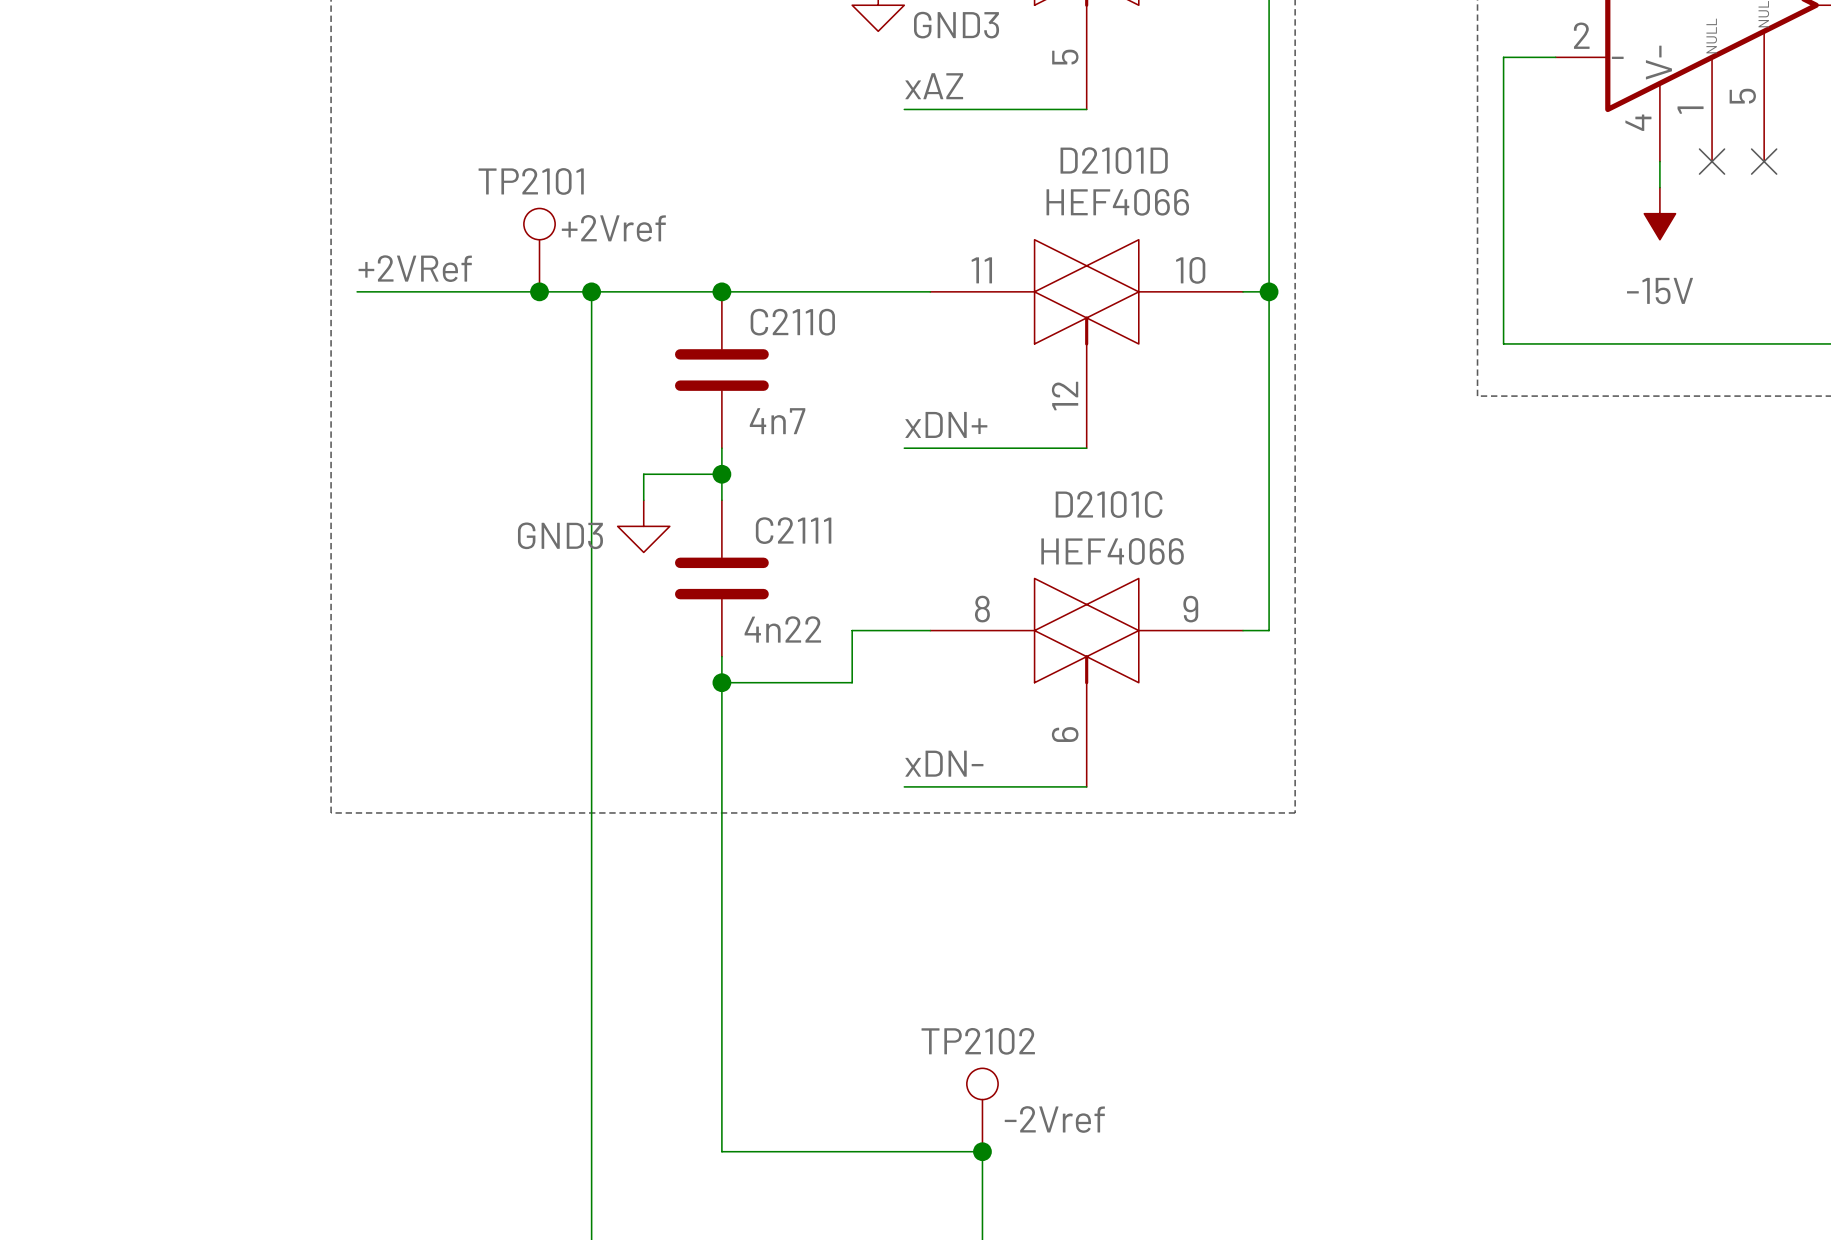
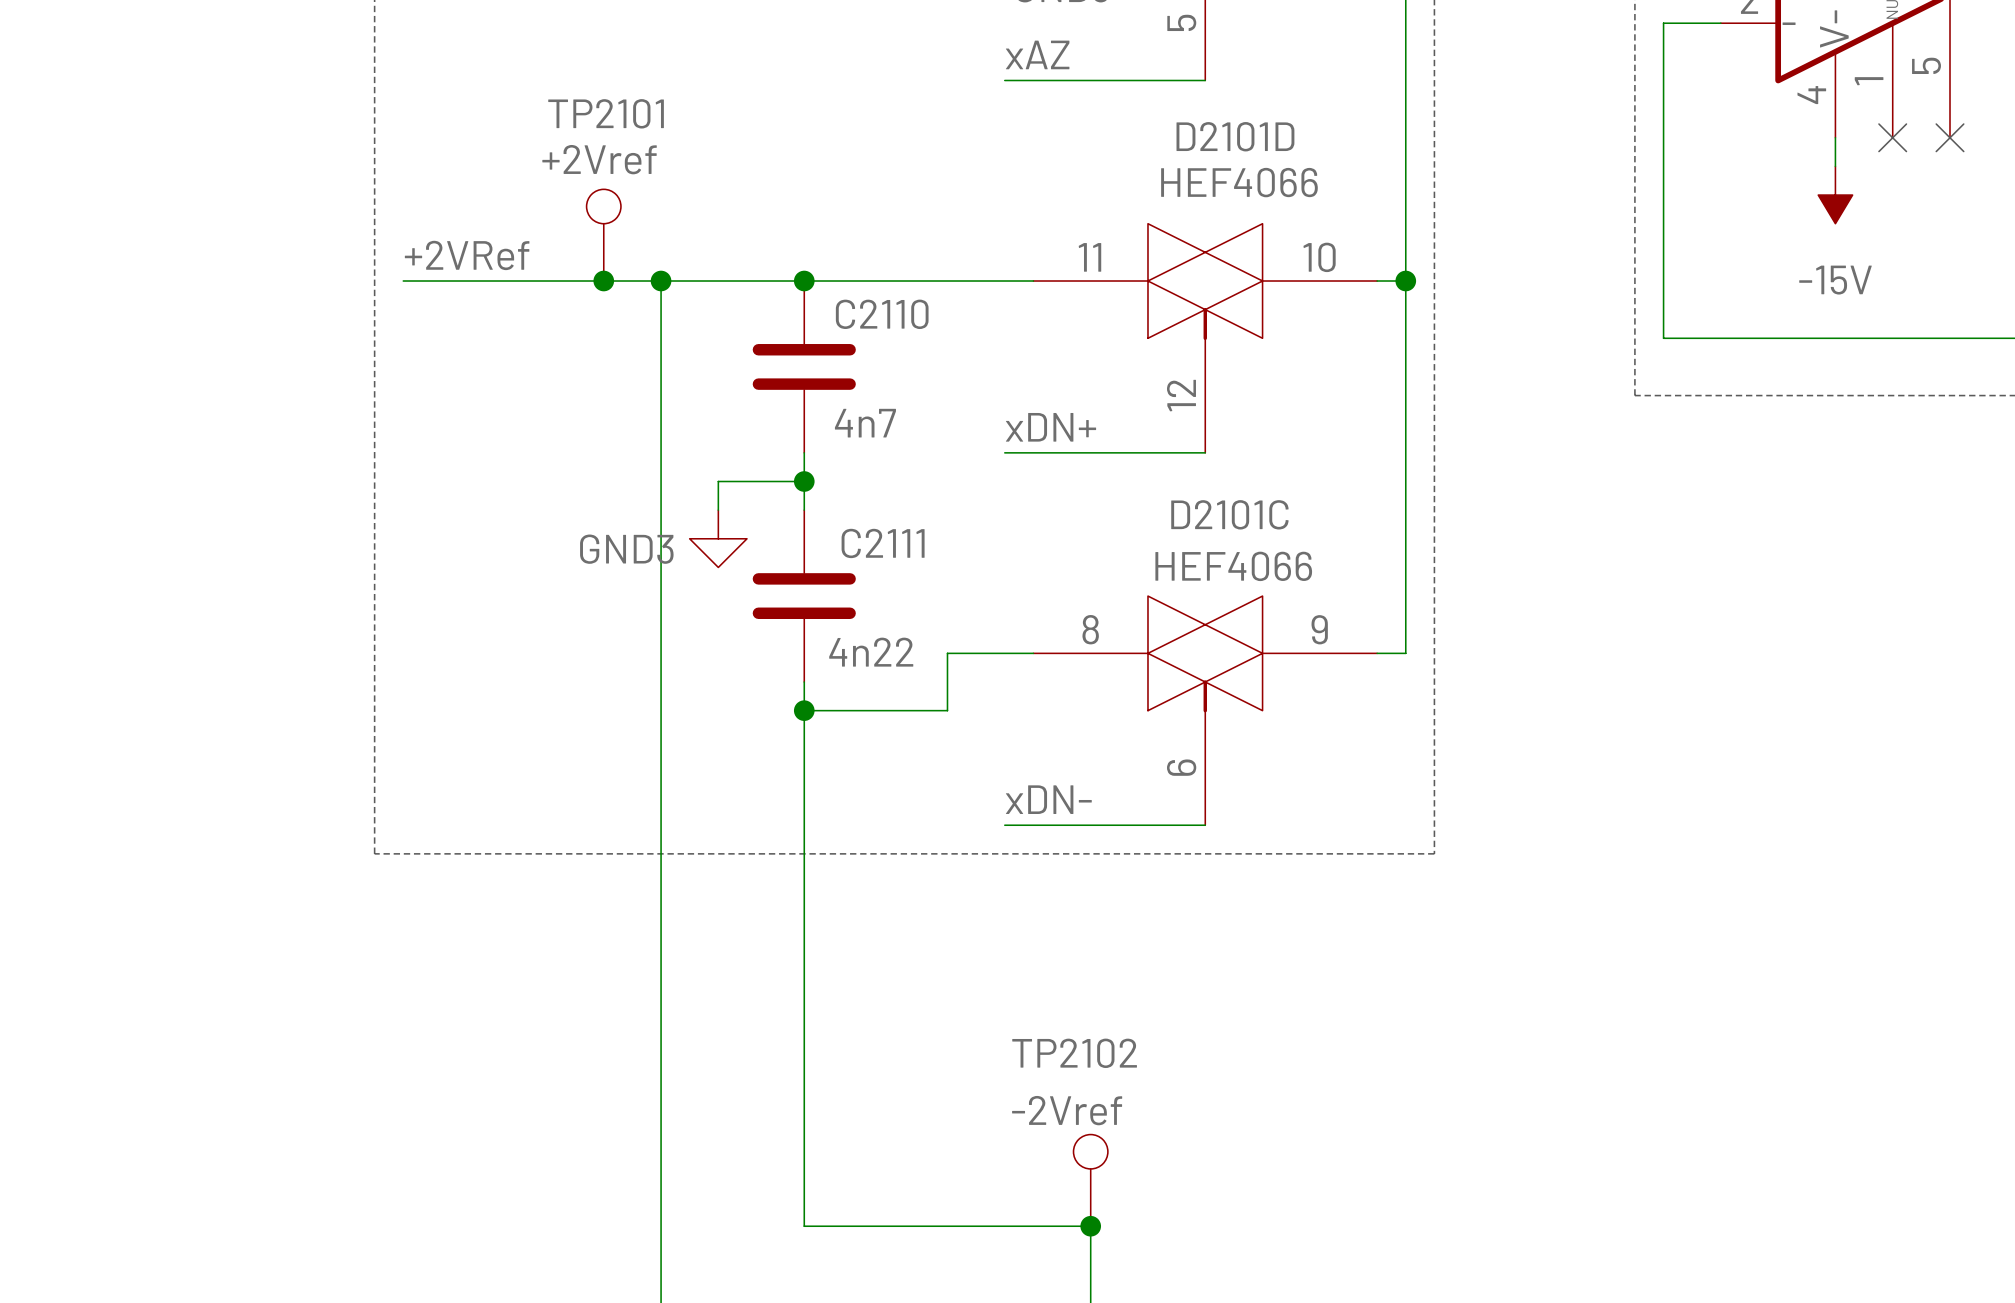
TP2101 name position: TP2101 (531, 181) -> TP2101 (606, 113)
TP2101 value position: +2Vref (613, 228) -> +2Vref (599, 159)
TP2102 name position: TP2102 (978, 1041) -> TP2102 (1074, 1053)
TP2102 value position: -2Vref (1054, 1119) -> -2Vref (1067, 1110)

